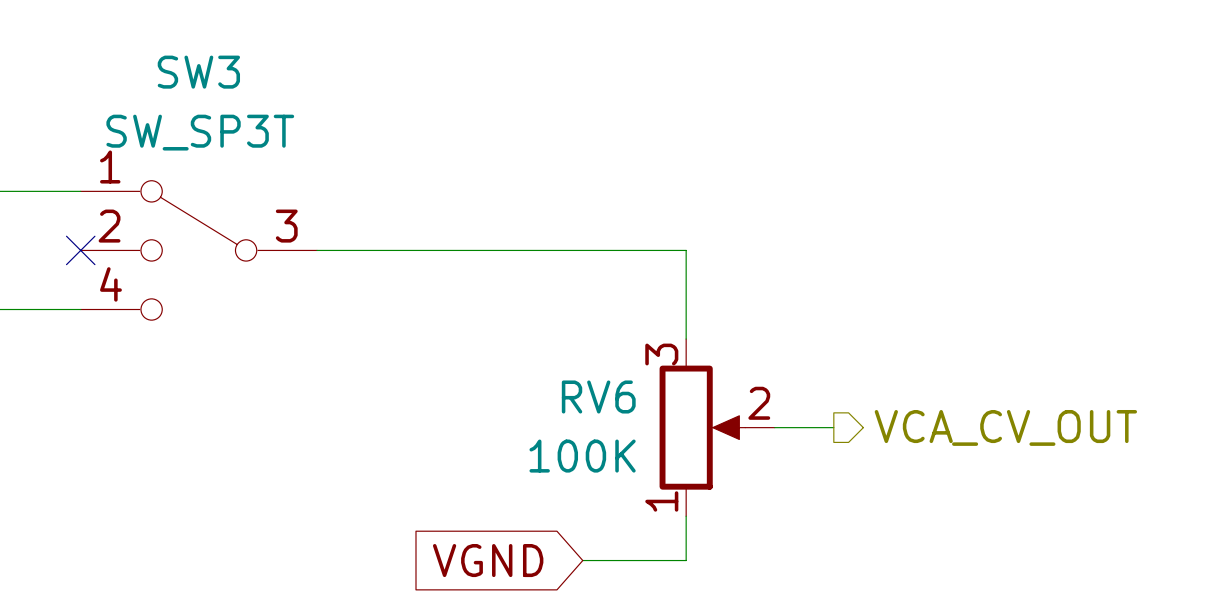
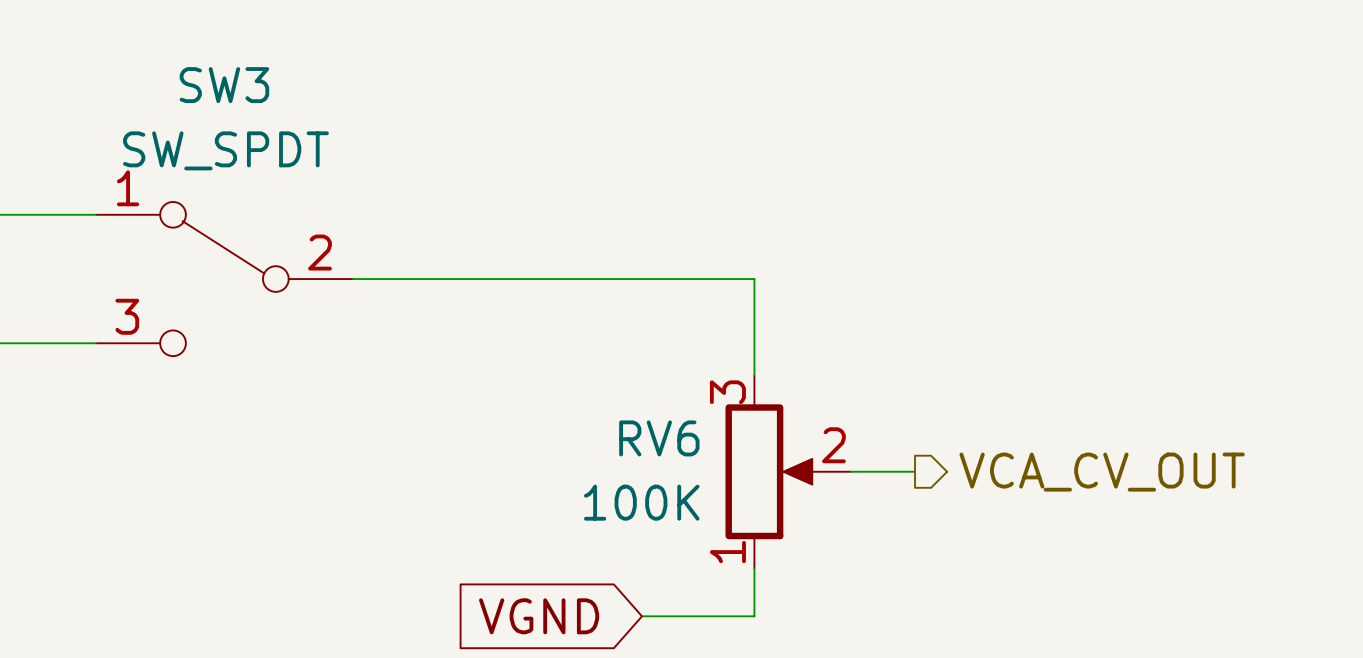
SW3 value: SW_SP3T (200, 132) -> SW_SPDT (225, 150)
SW3 symbol: [80, 180, 317, 321] -> [95, 201, 353, 357]
no-connect mark: (80, 250) -> none

